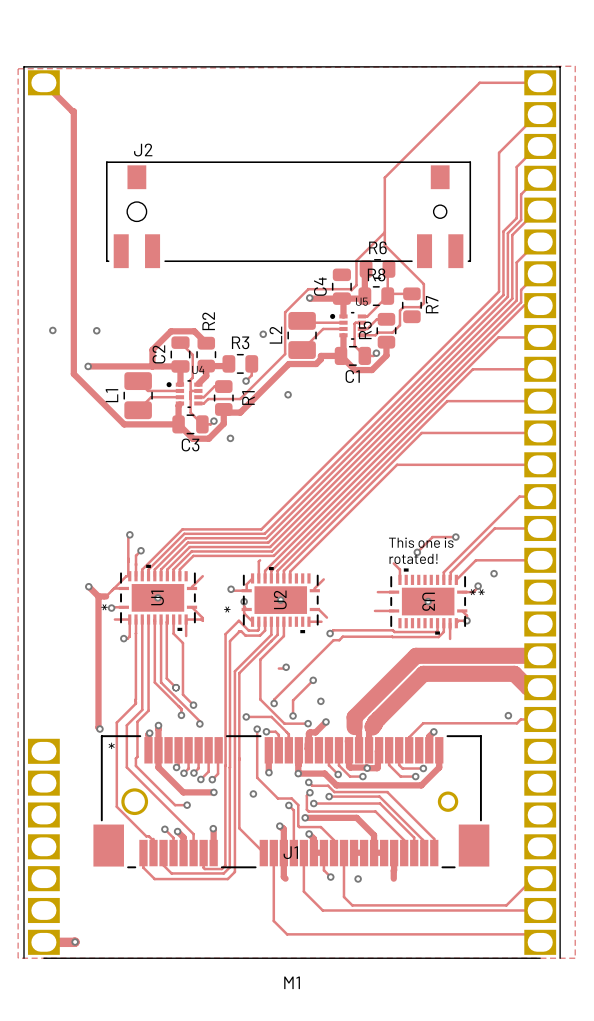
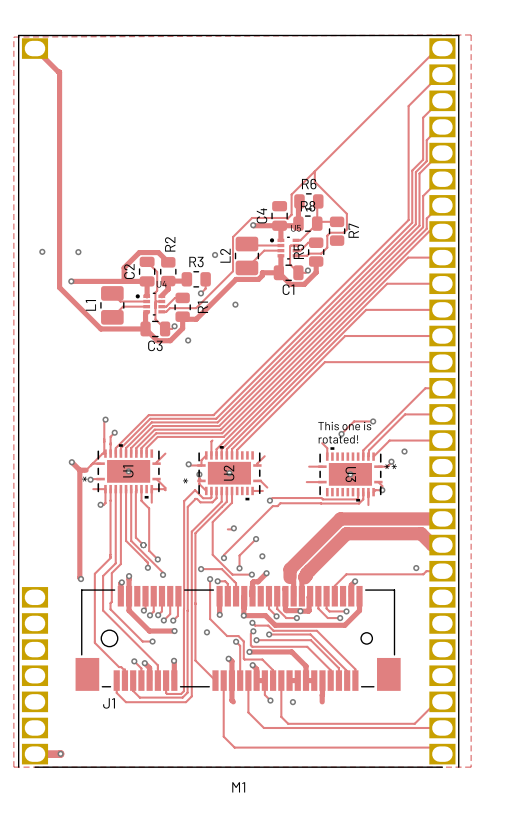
track: (534, 82) (479, 82) (384, 177) (384, 232) -> (437, 48) (314, 171)
J2: (288, 214) -> none
J1 footprint: [93, 735, 490, 869] -> [75, 585, 401, 691]
J1 name position: J1 (290, 852) -> J1 (109, 703)

